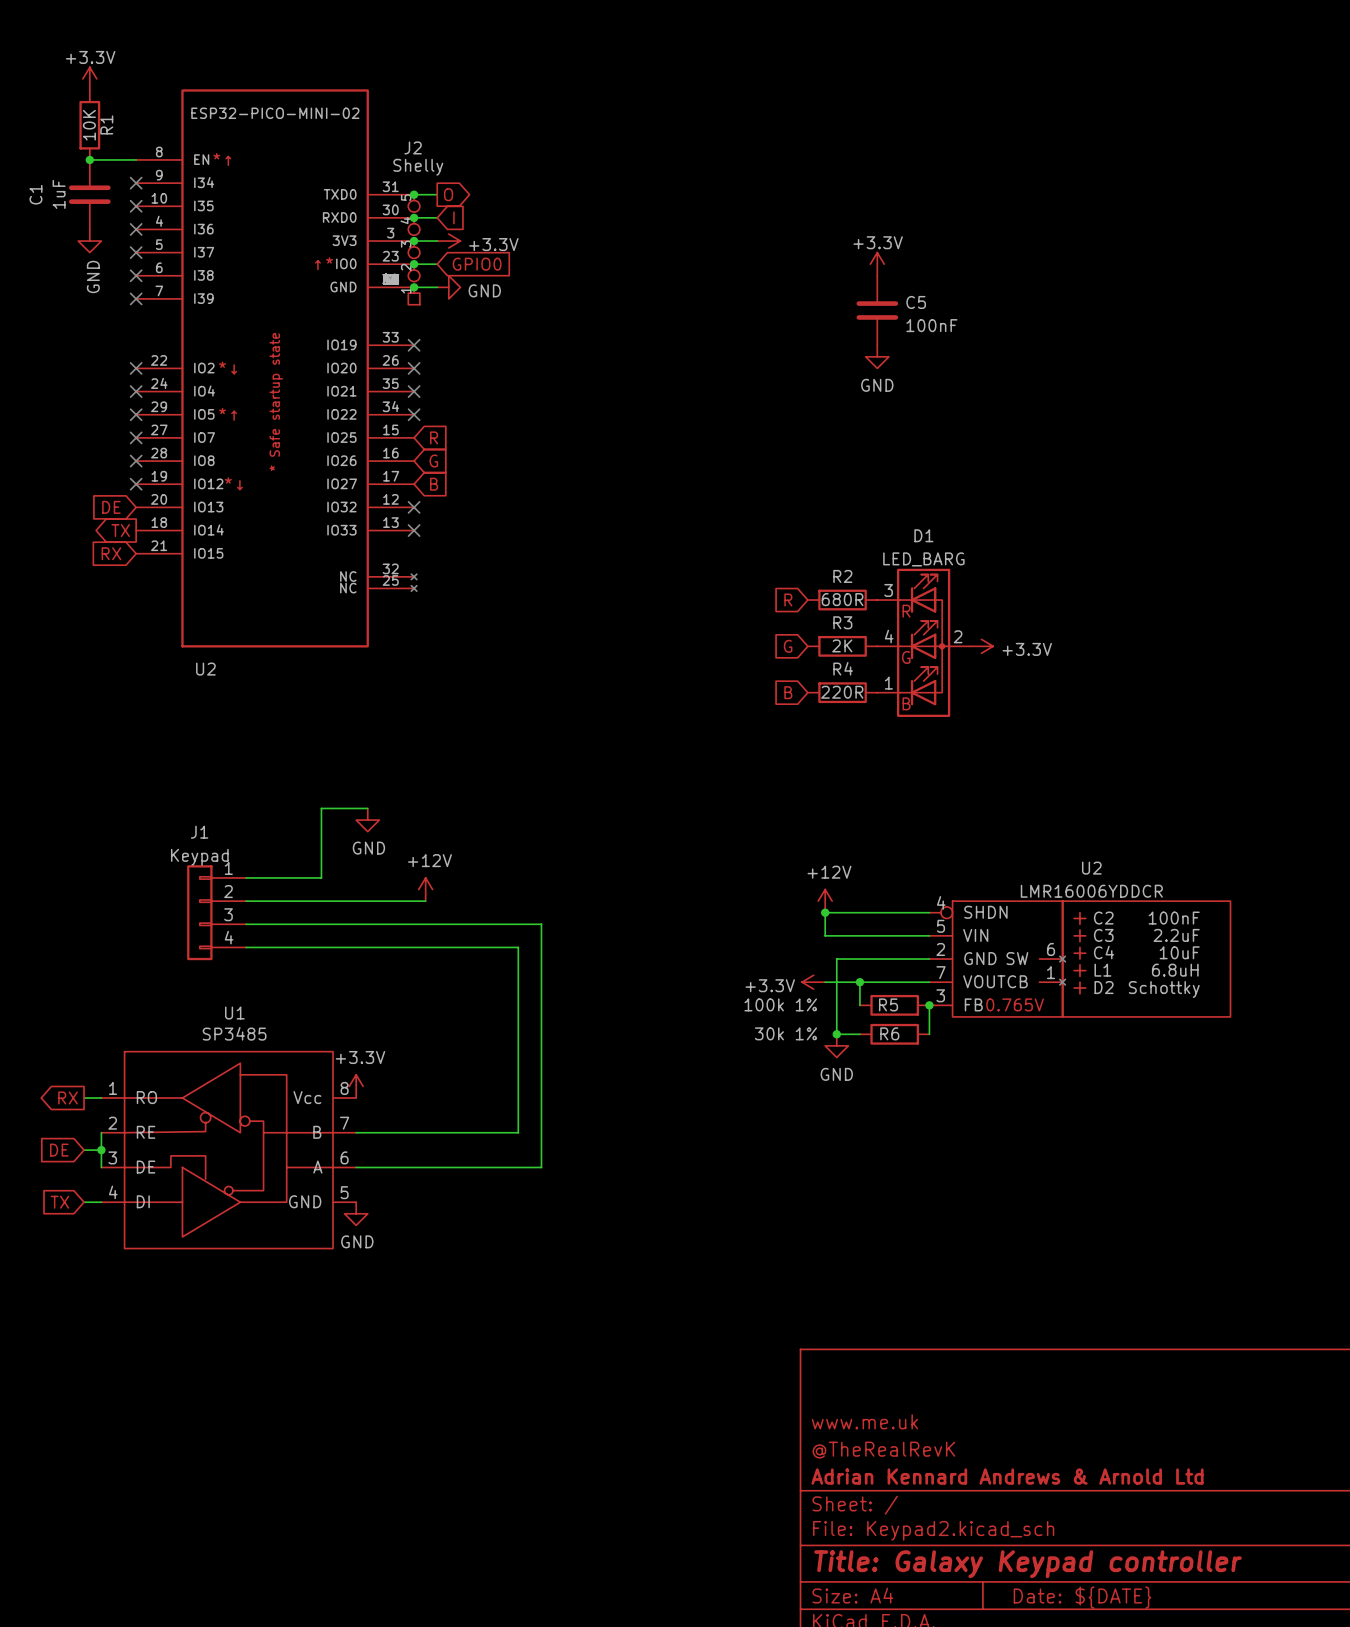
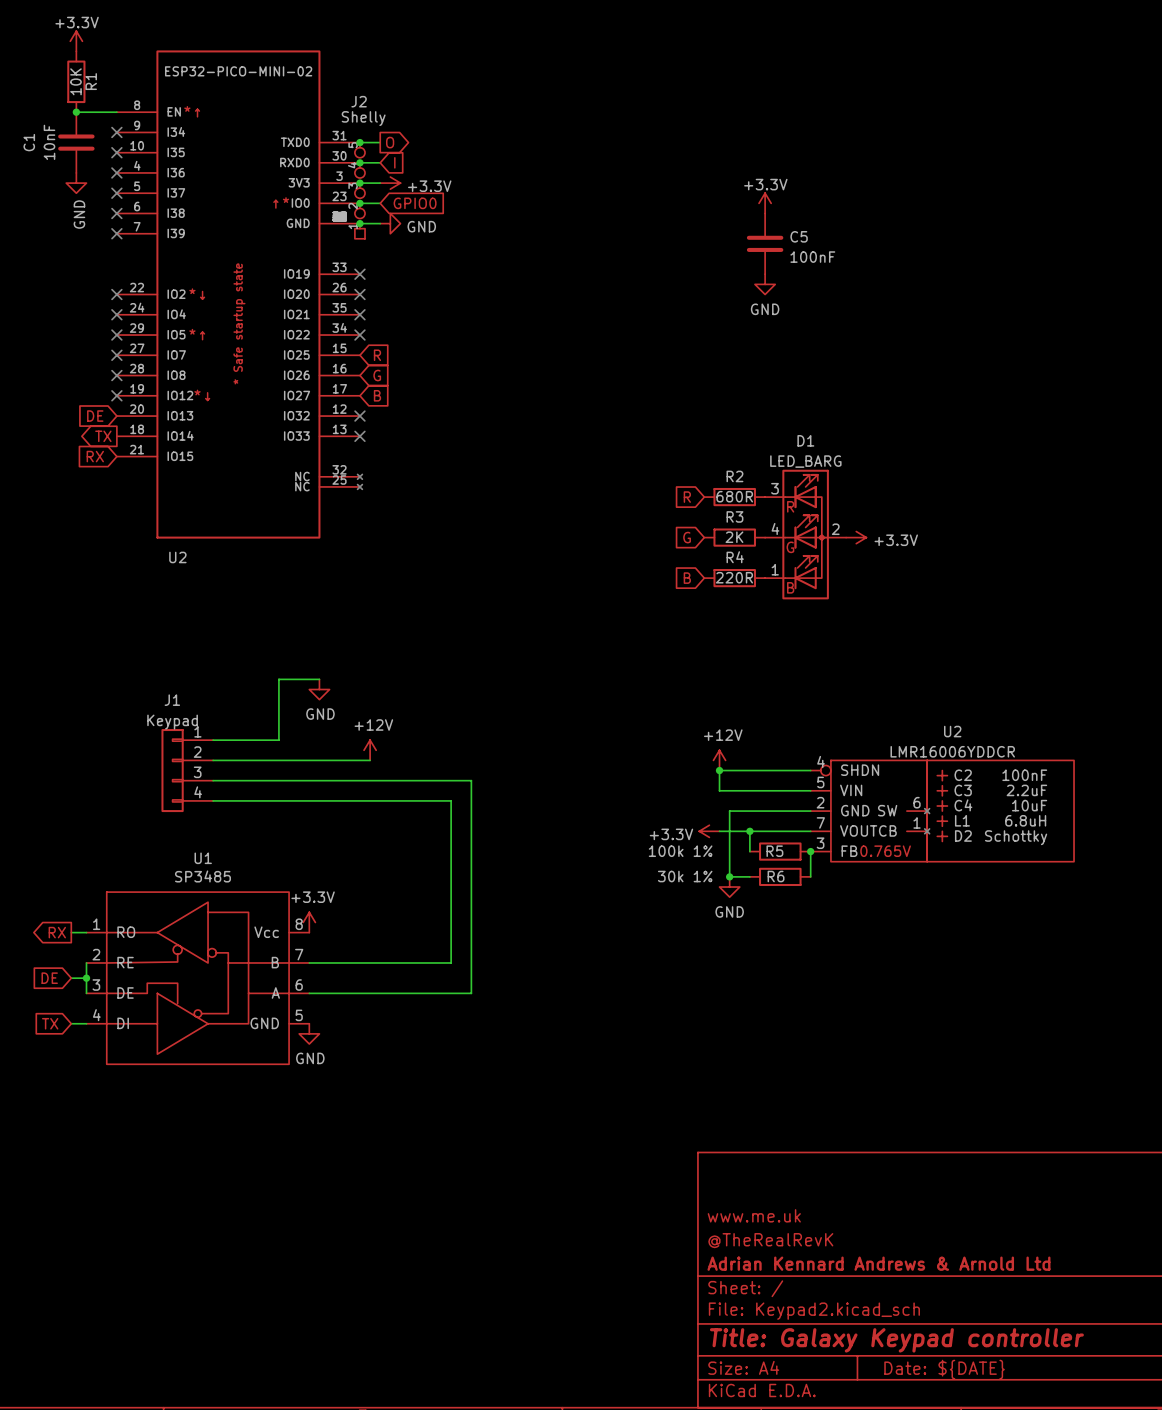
C1 value: 1uF (59, 194) -> 10nF (49, 142)

